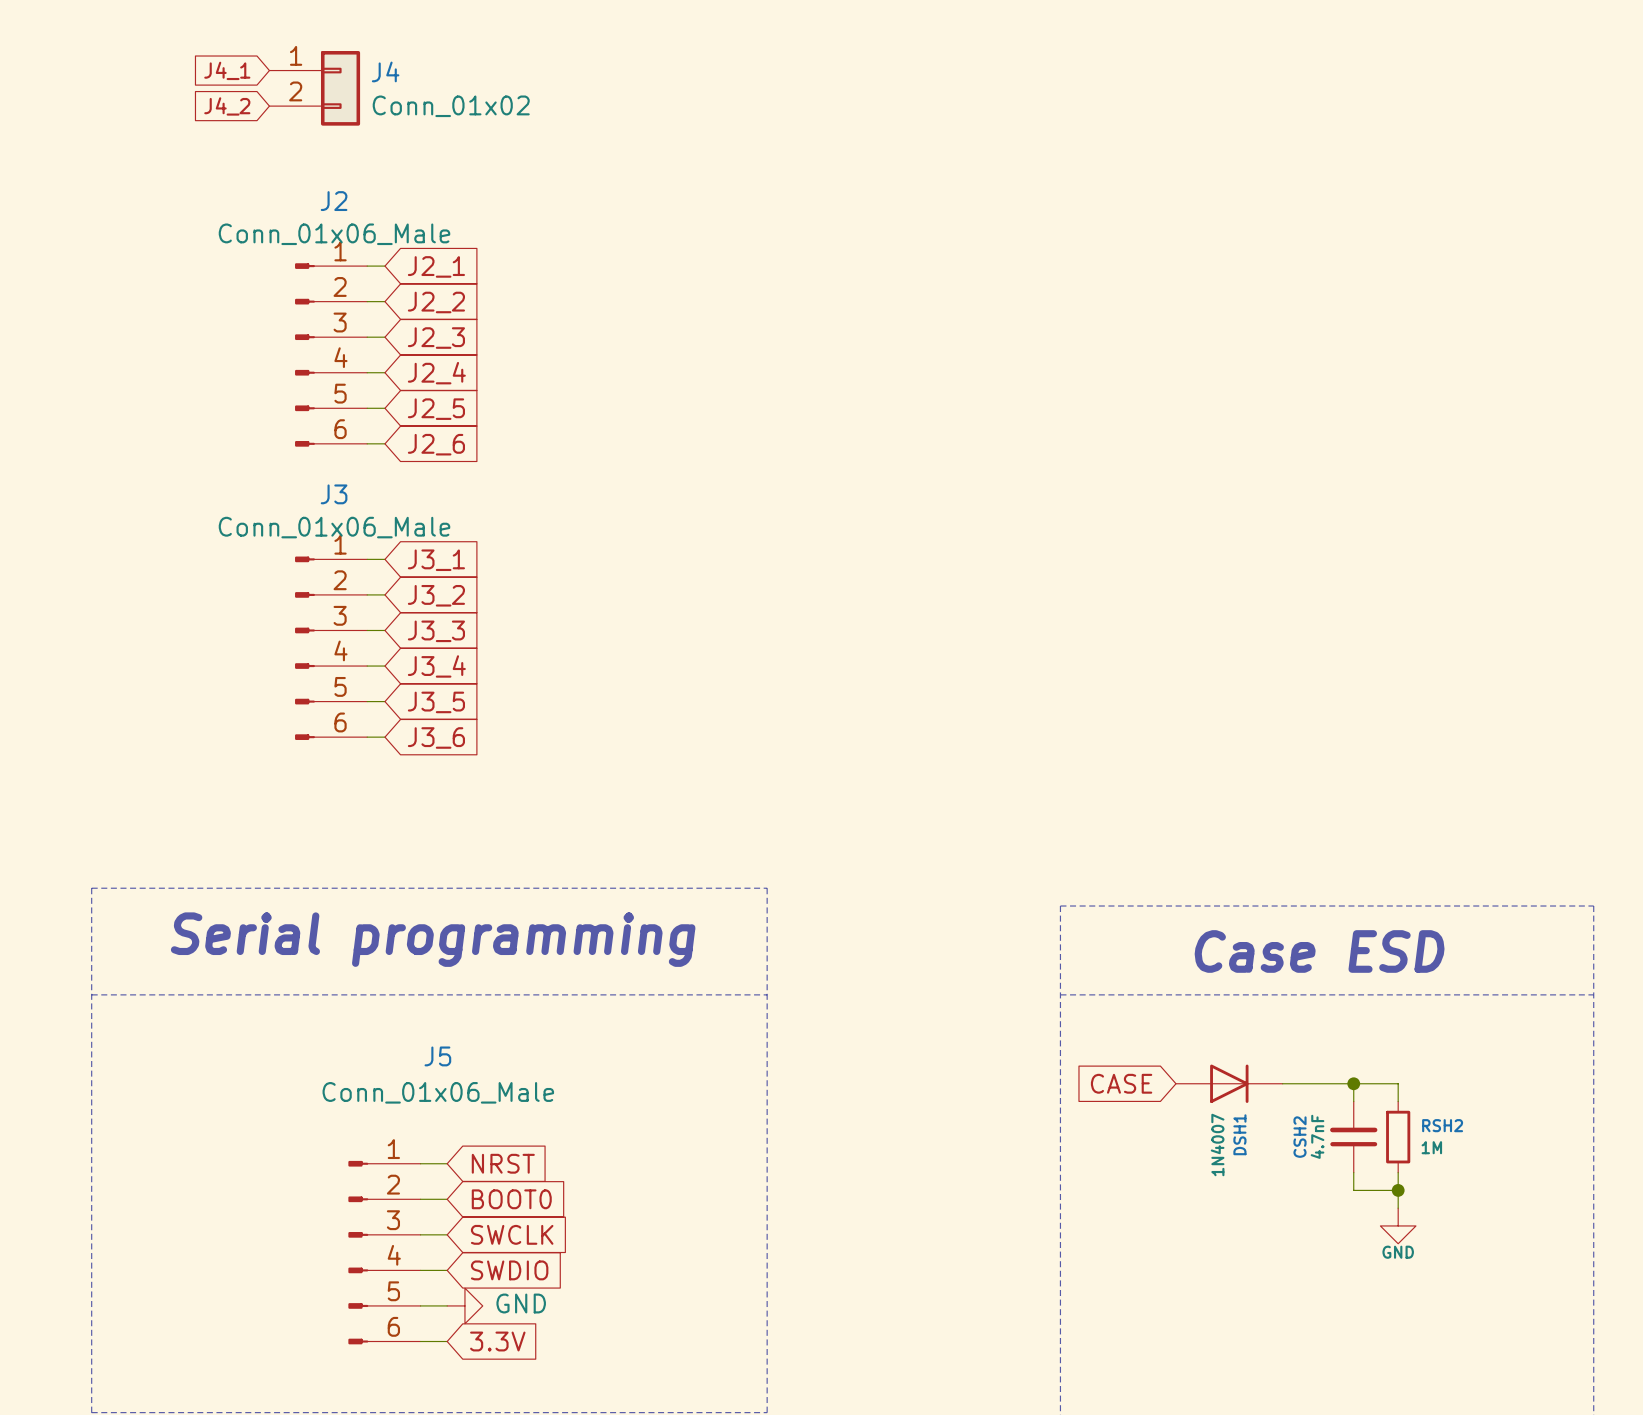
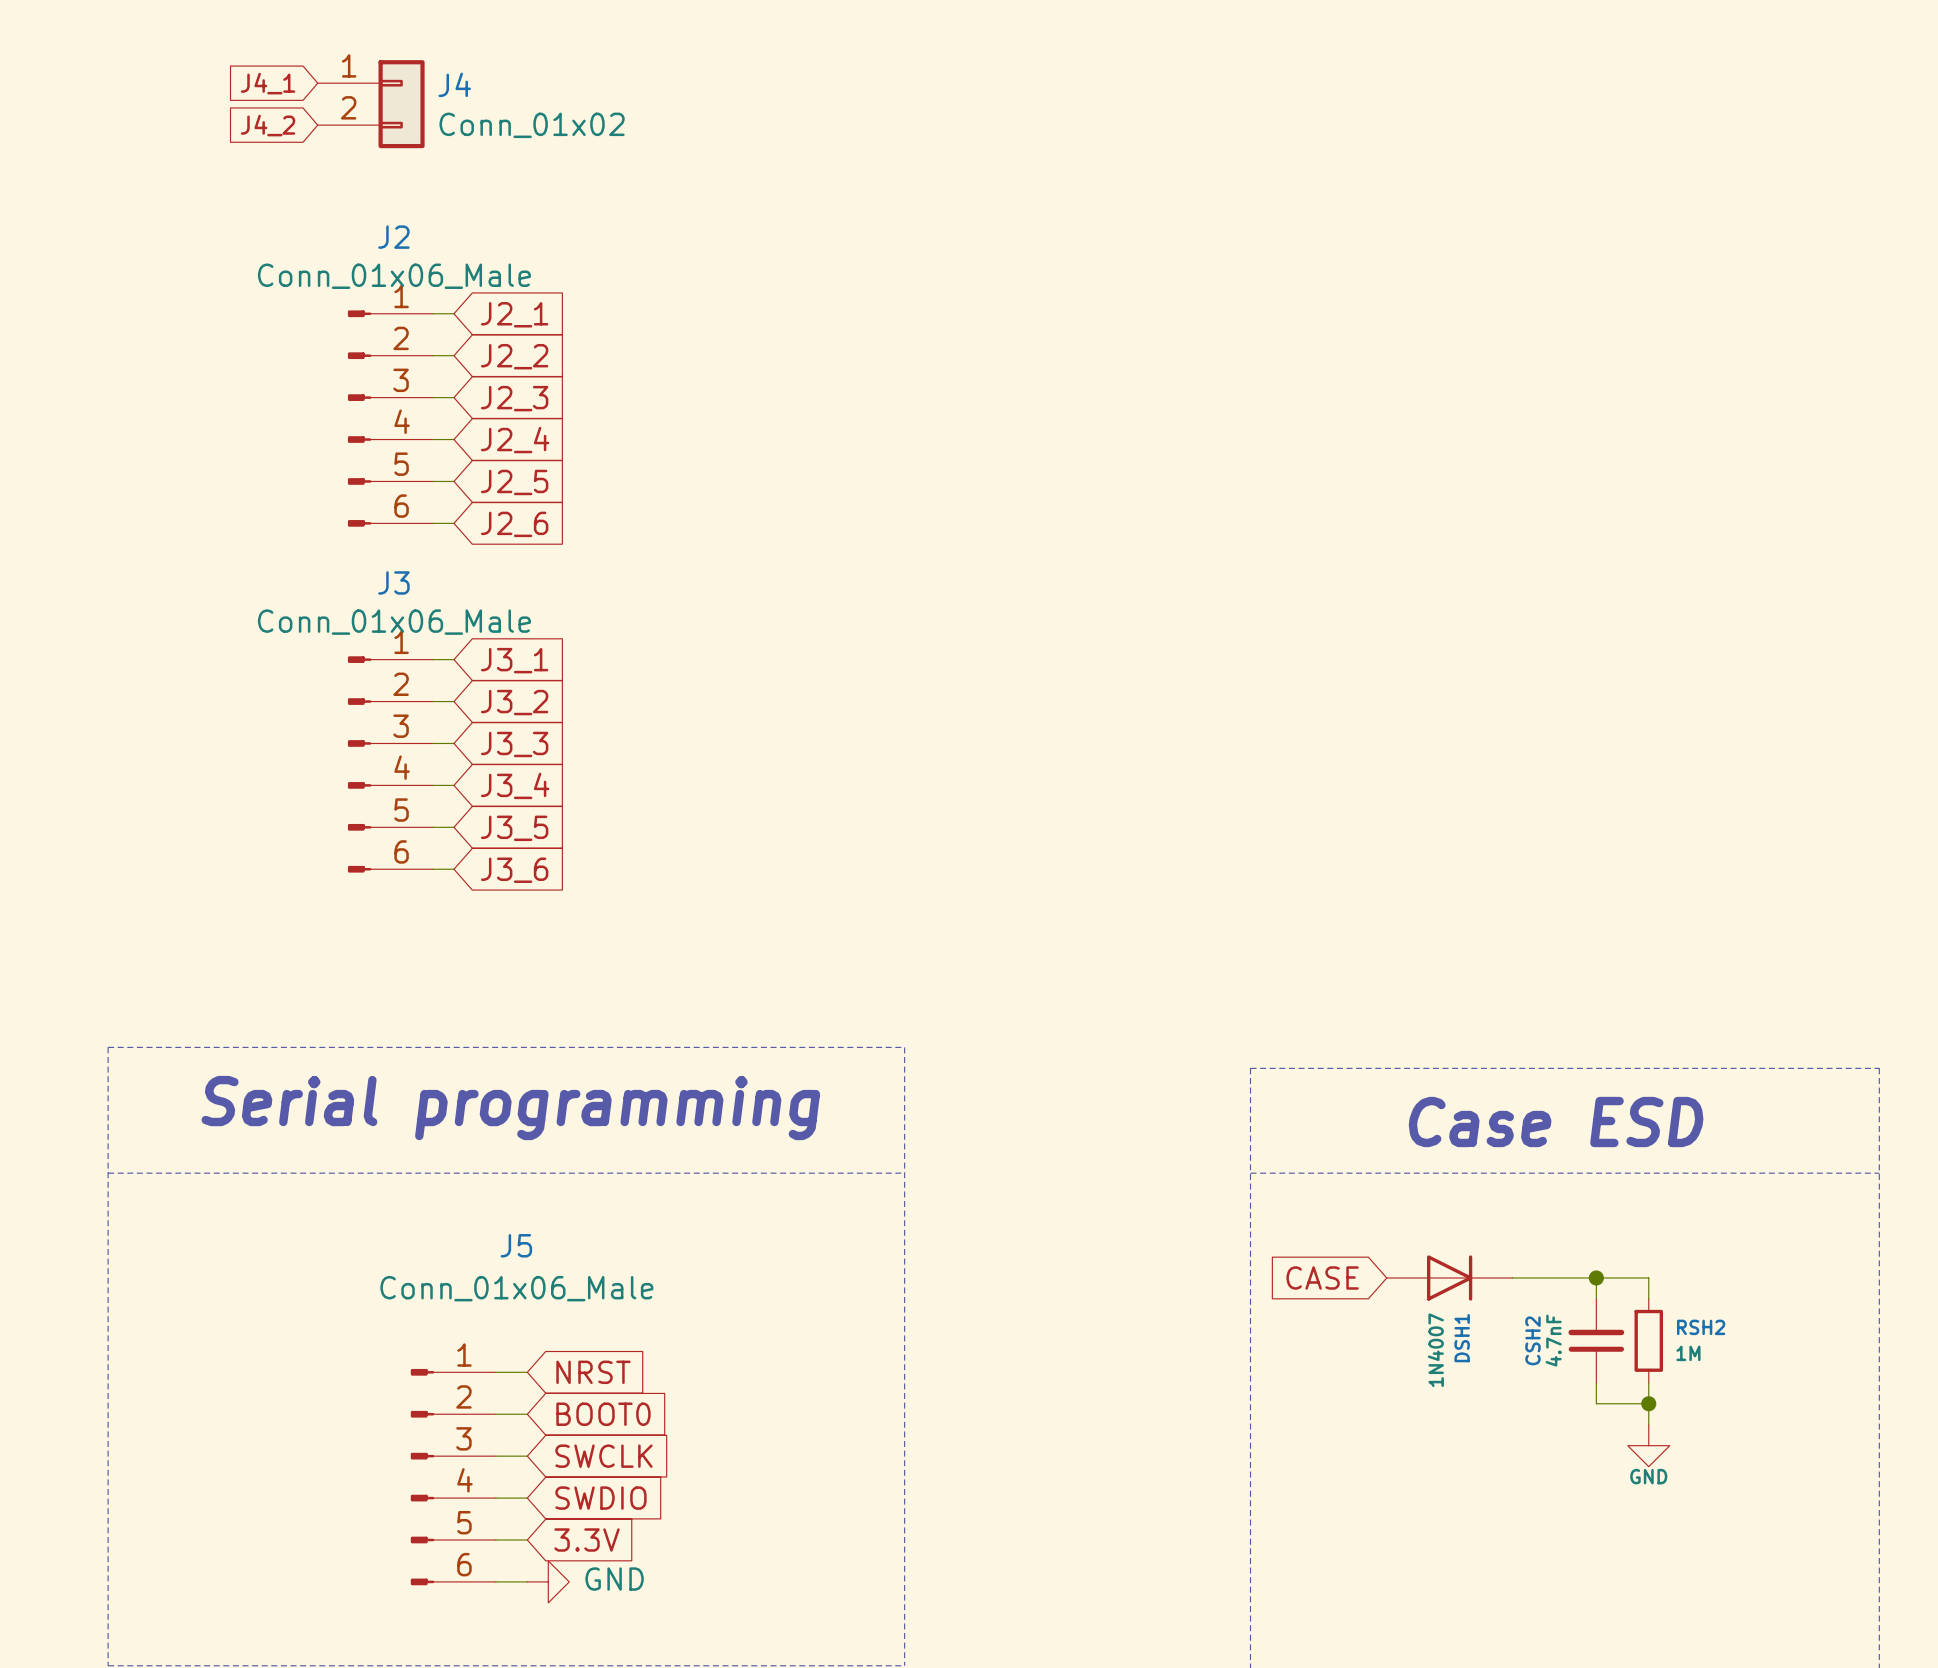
power symbol position: GND (464, 1305) -> GND (548, 1581)
global label position: 3.3V (497, 1341) -> 3.3V (587, 1540)

